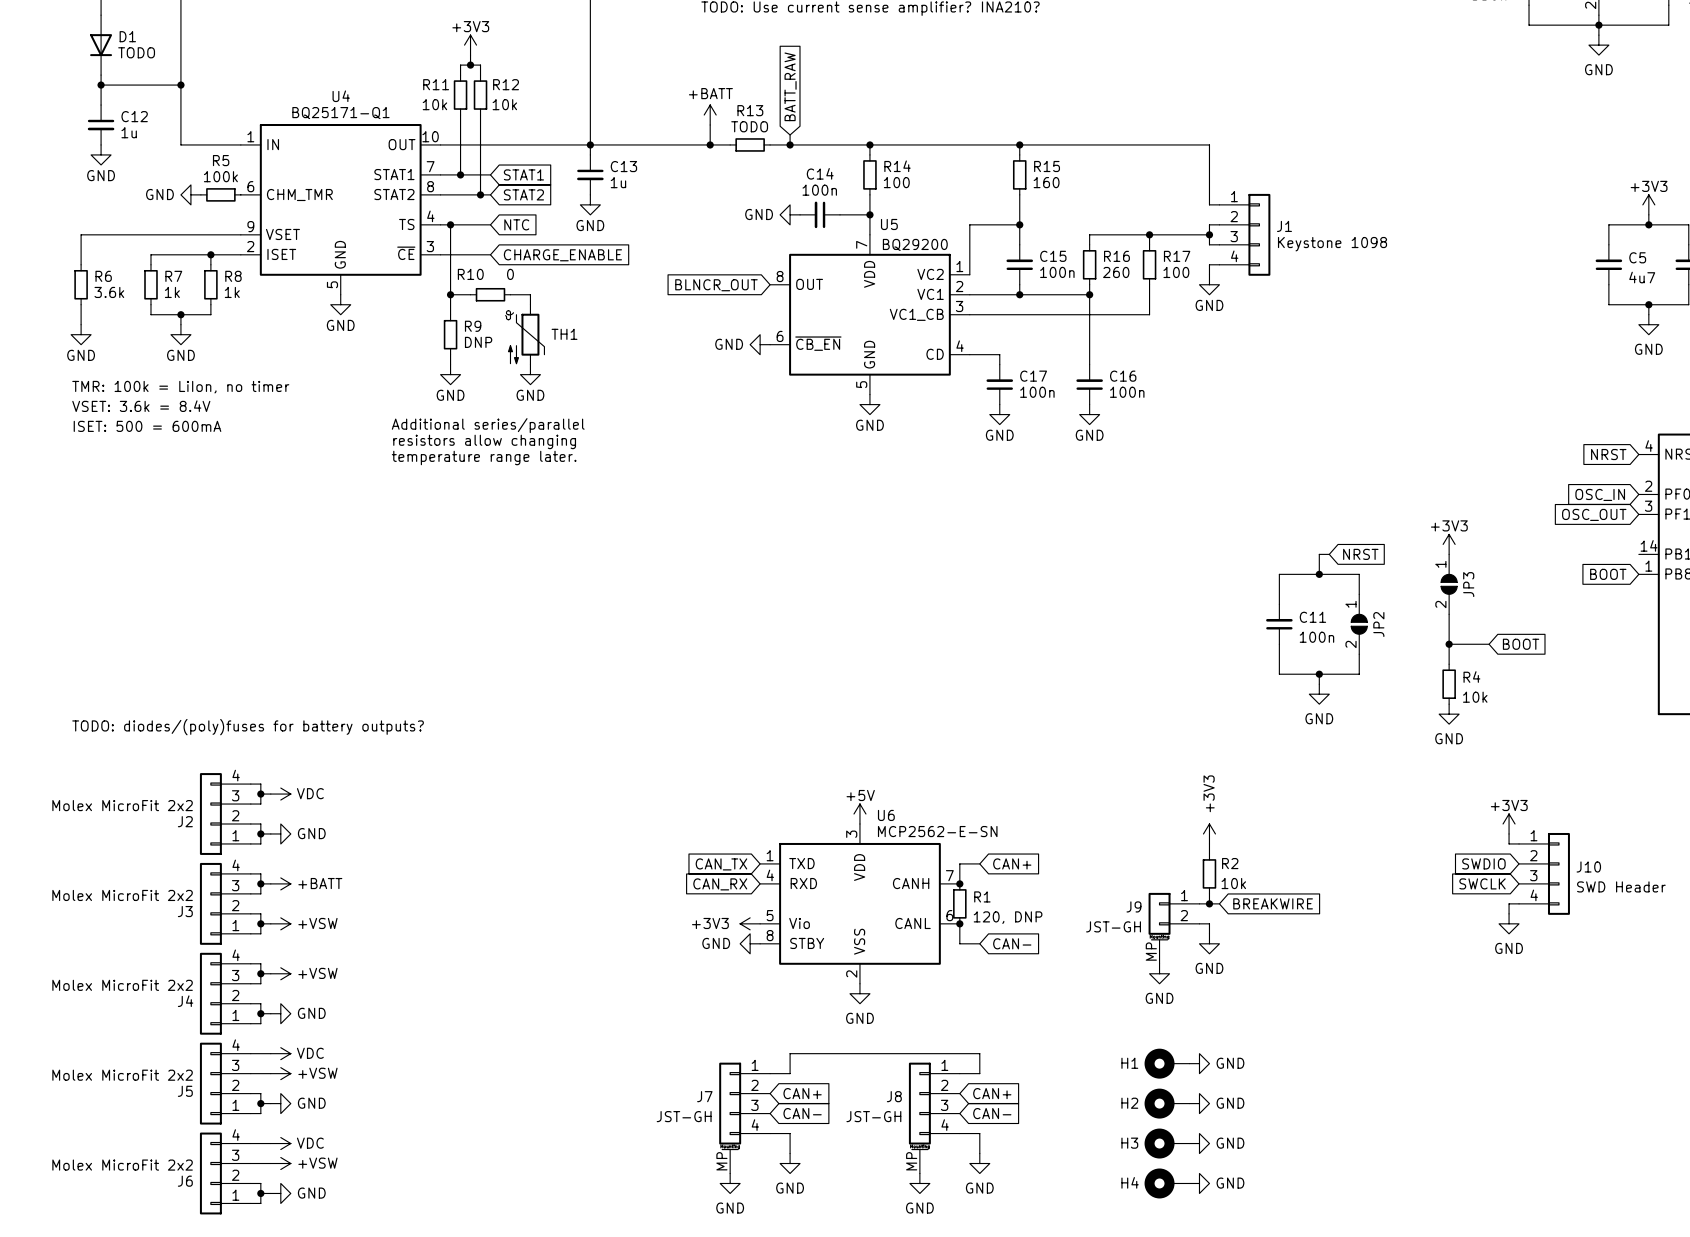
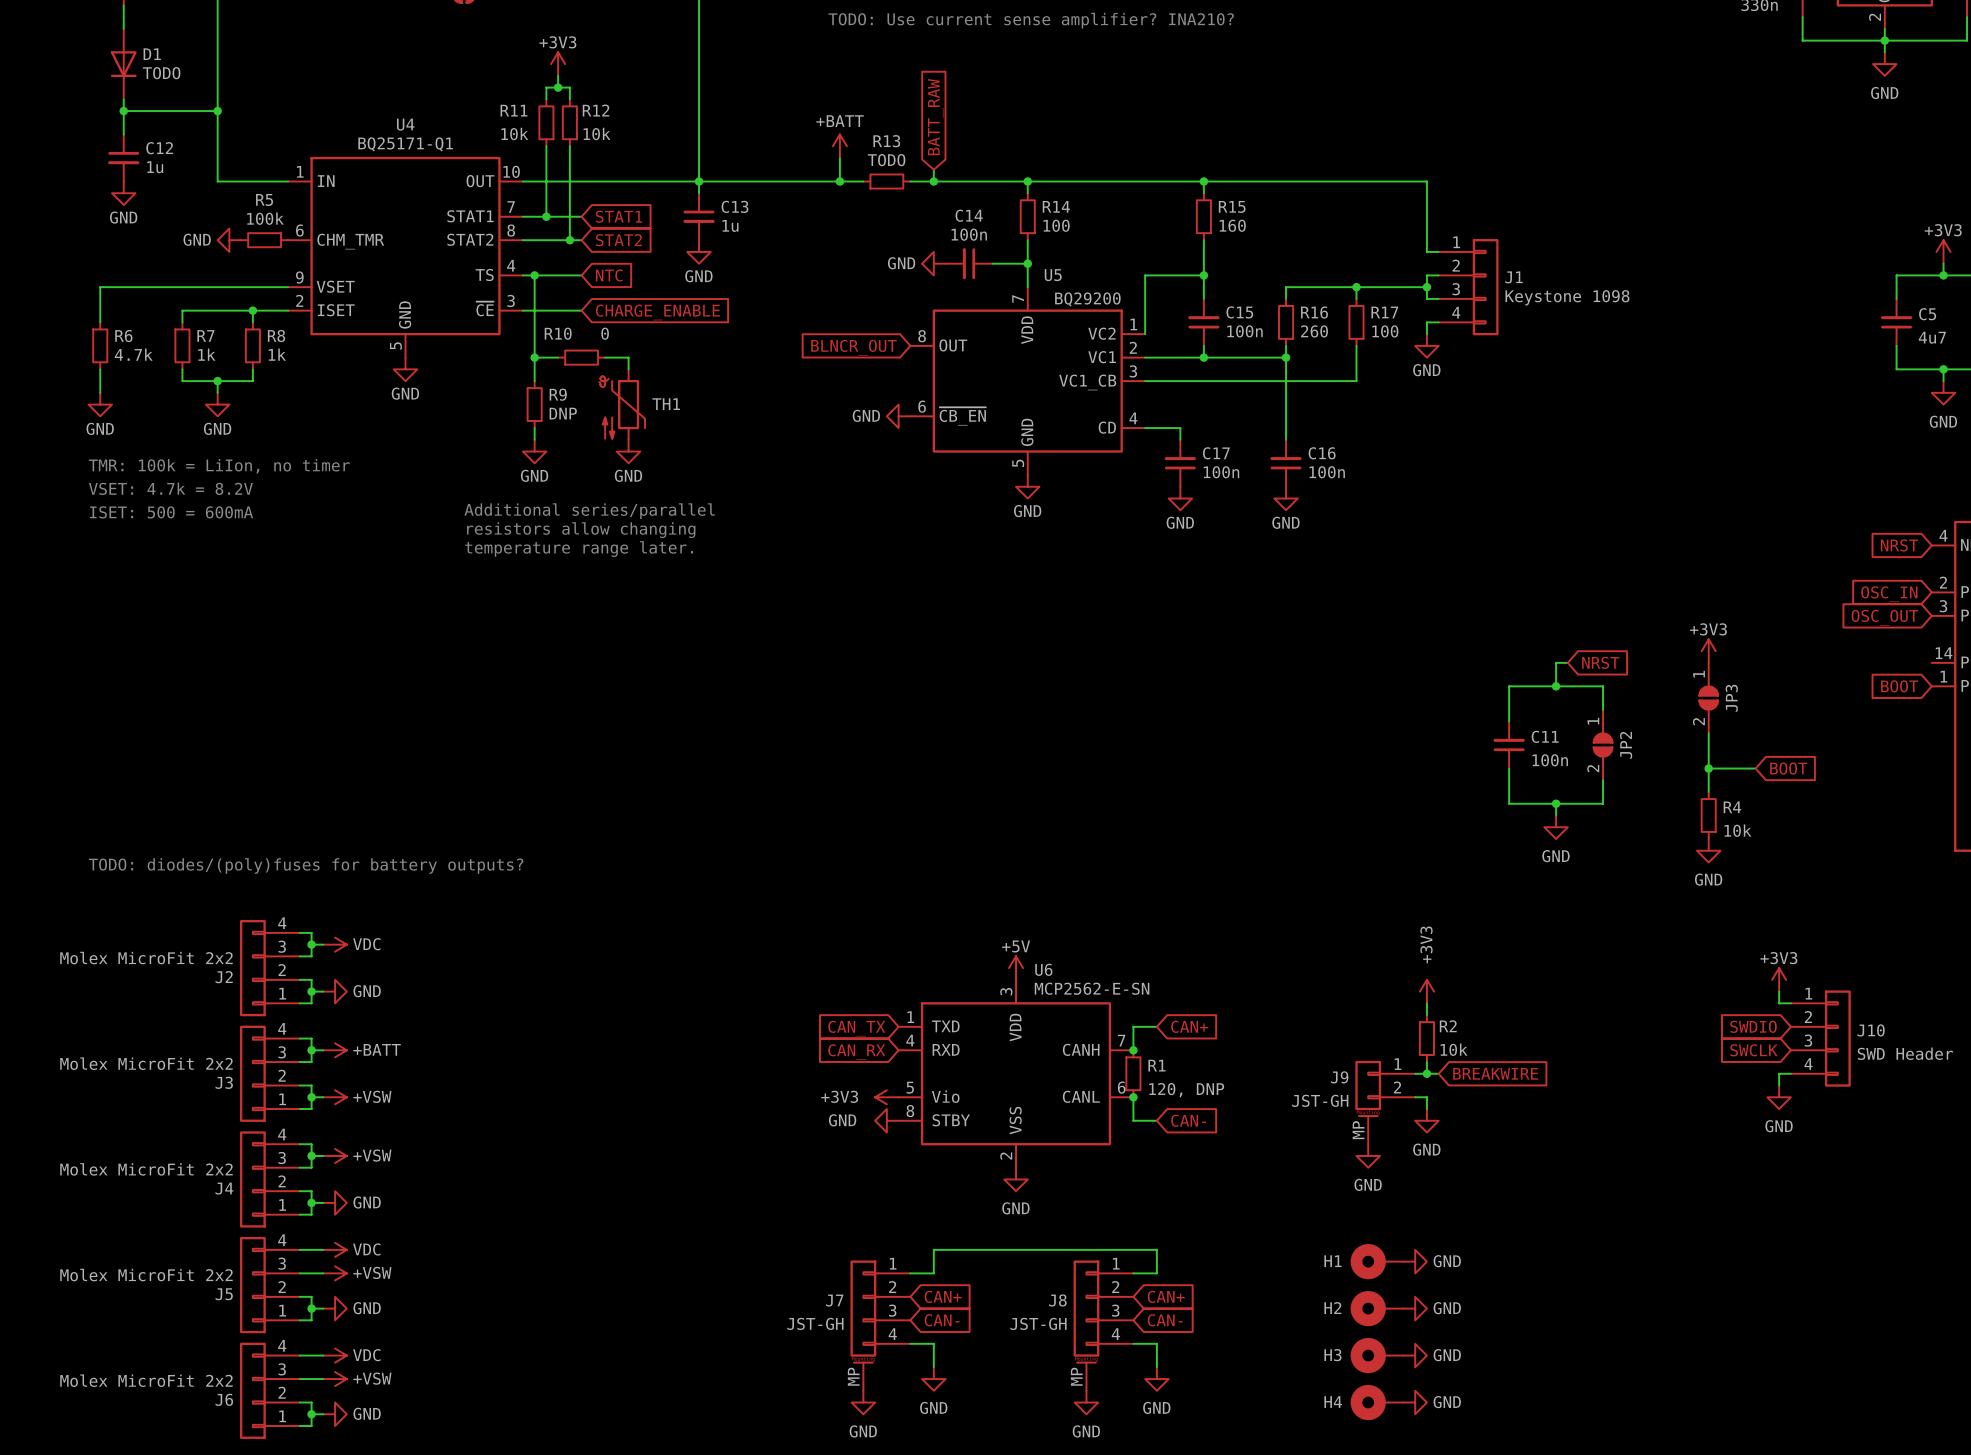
R6 value: 3.6k (109, 292) -> 4.7k (133, 354)
text: VSET: 3.6k = 8.4V (141, 406) -> VSET: 4.7k = 8.2V (170, 488)

